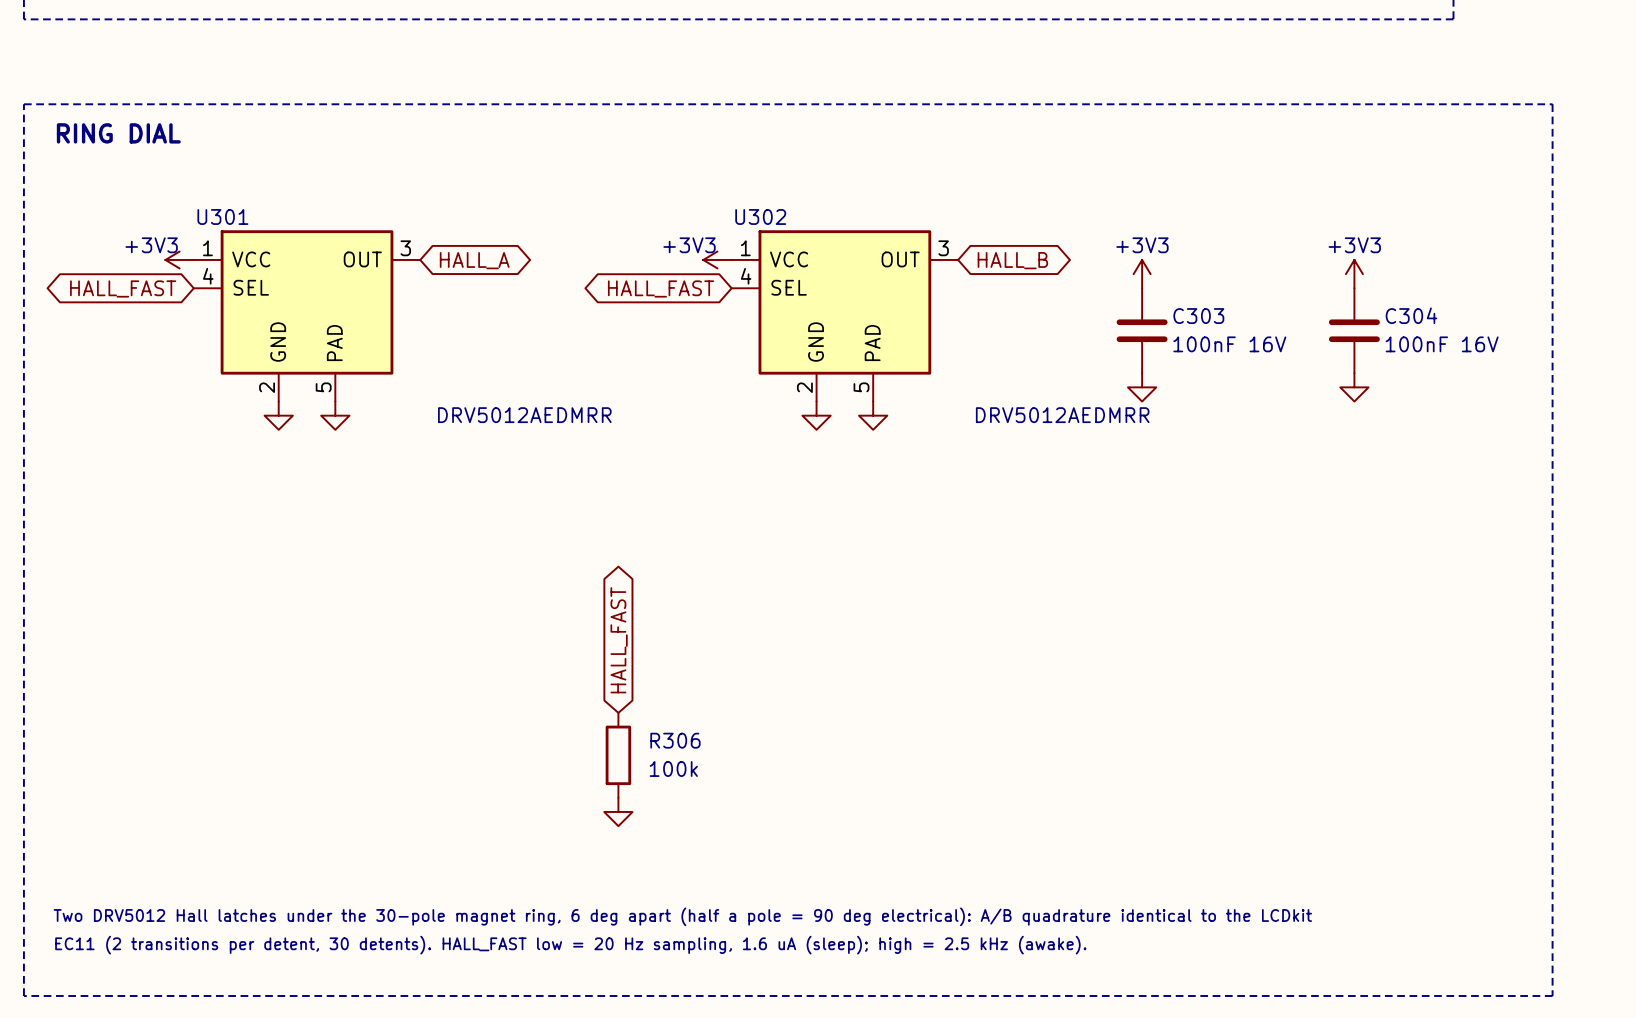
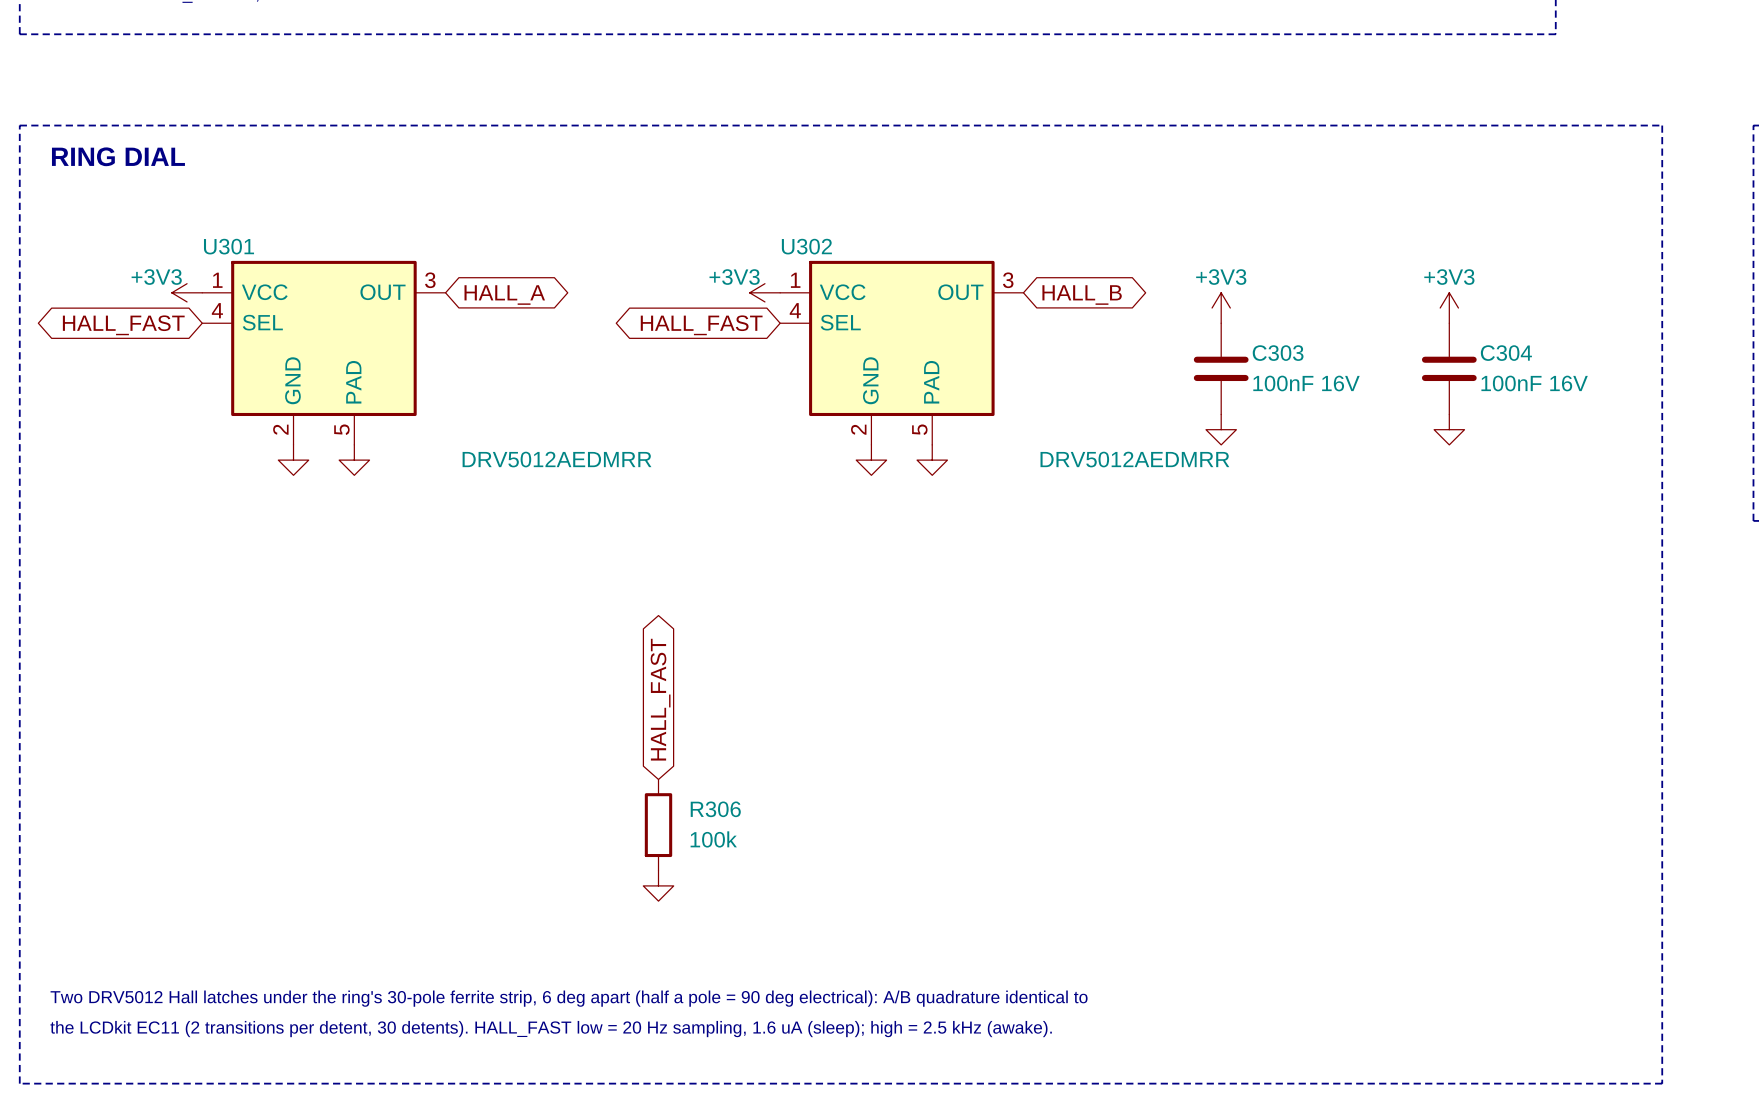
text: Two DRV5012 Hall latches under the 30-pole magnet ring, 6 deg apart (half a pole = 90 deg electrical): A/B quadrature identical to the LCDkit (682, 916) -> Two DRV5012 Hall latches under the ring's 30-pole ferrite strip, 6 deg apart (half a pole = 90 deg electrical): A/B quadrature identical to (569, 998)
text: EC11 (2 transitions per detent, 30 detents). HALL_FAST low = 20 Hz sampling, 1.6 uA (sleep); high = 2.5 kHz (awake). (570, 945) -> the LCDkit EC11 (2 transitions per detent, 30 detents). HALL_FAST low = 20 Hz sampling, 1.6 uA (sleep); high = 2.5 kHz (awake). (551, 1029)

